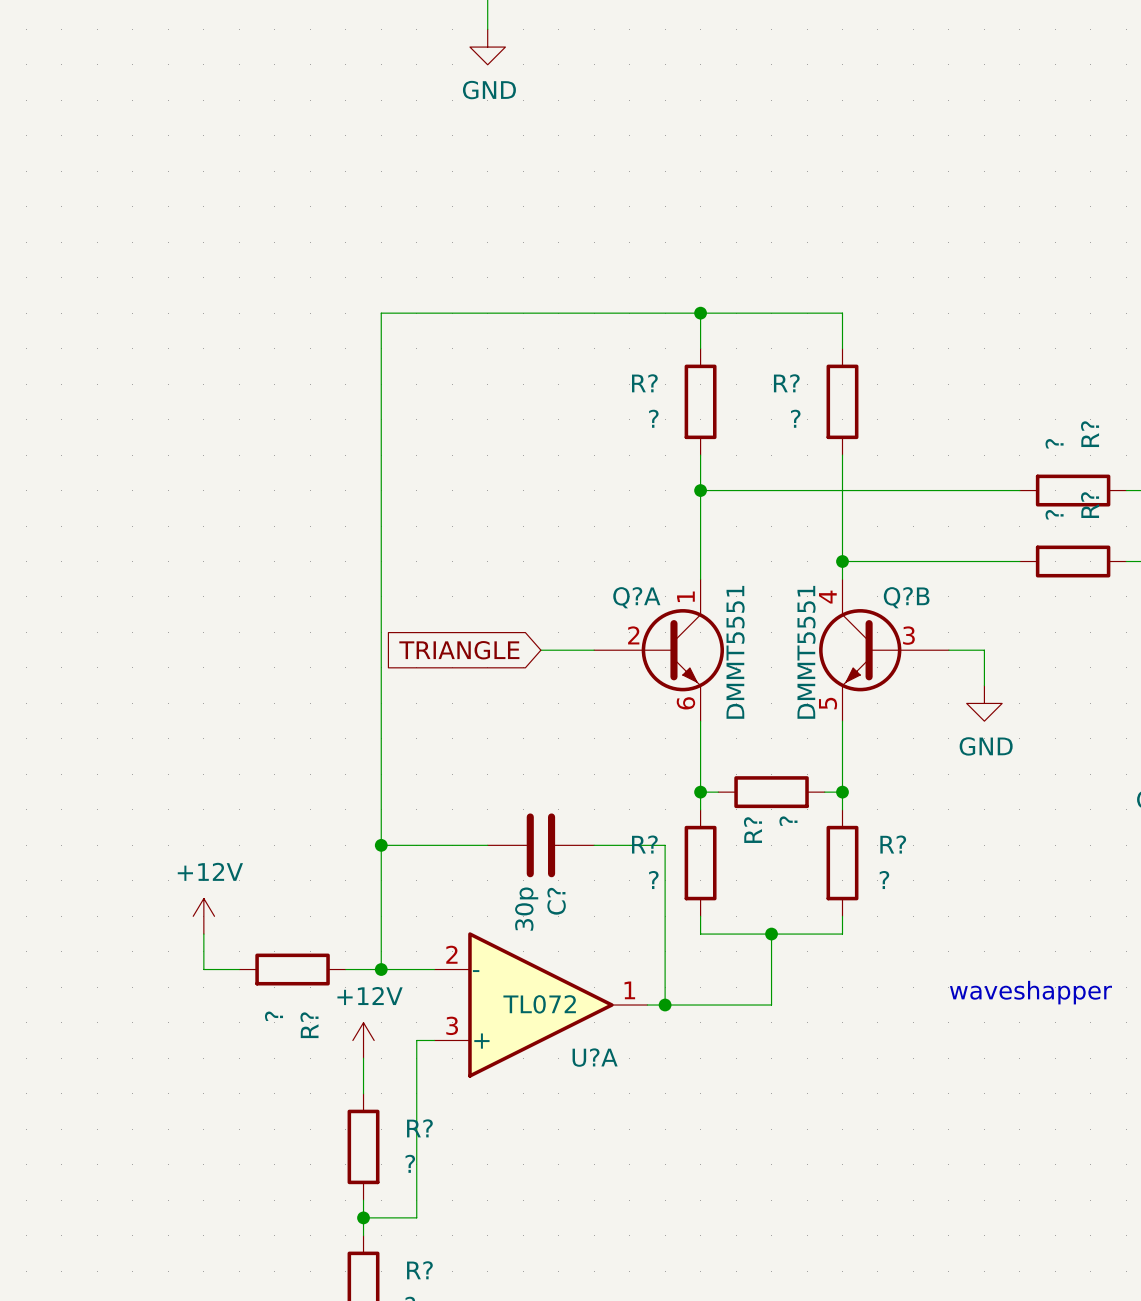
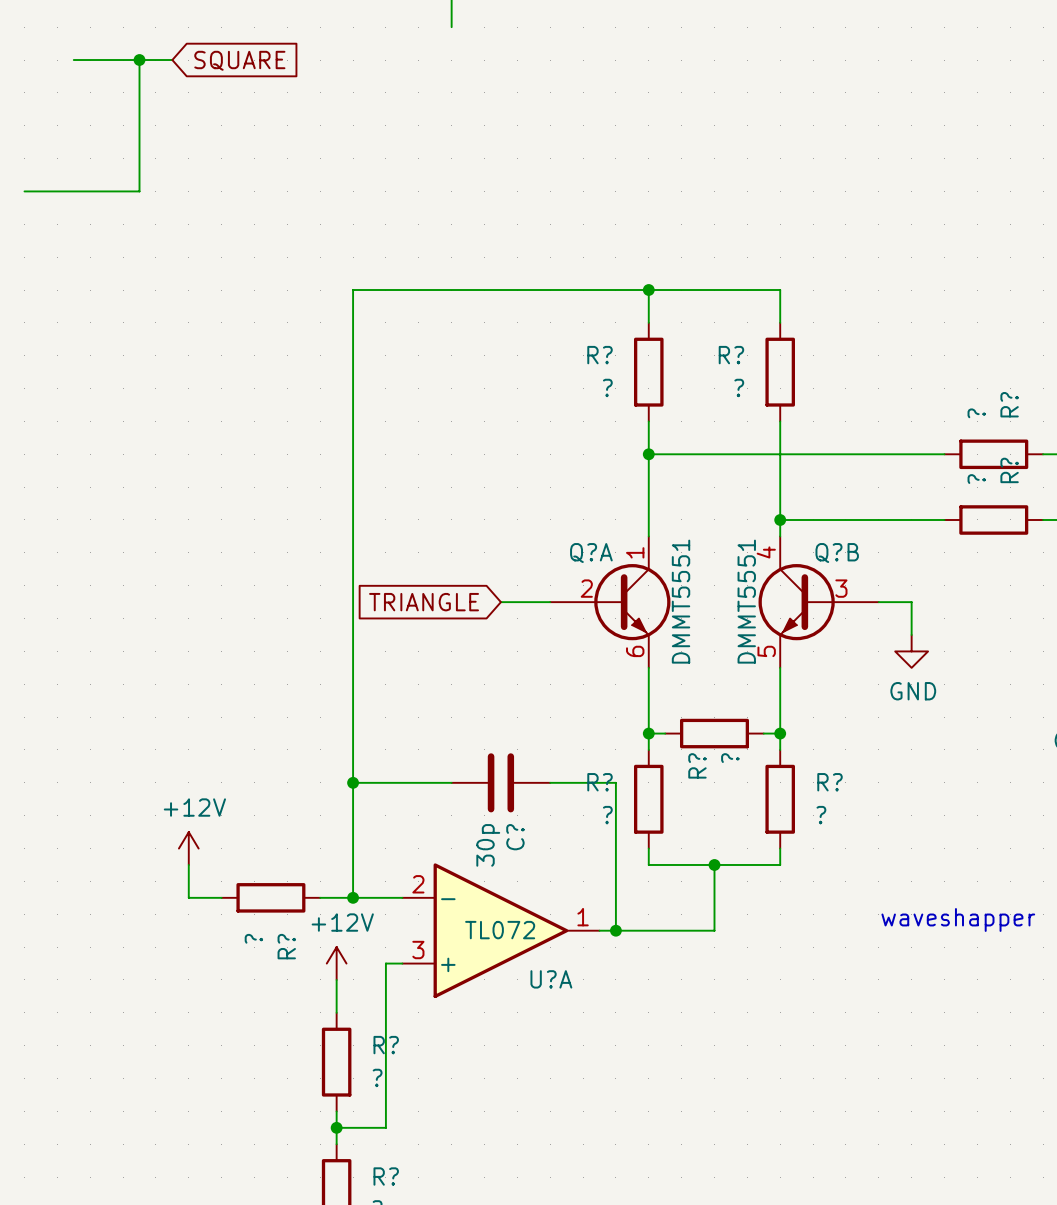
power symbol: GND (487, 47) -> none
wire: none -> (73, 60) (172, 60)
wire: none -> (139, 60) (139, 191) (24, 191)
junction: none -> (139, 60)
global label: none -> SQUARE (239, 60)

